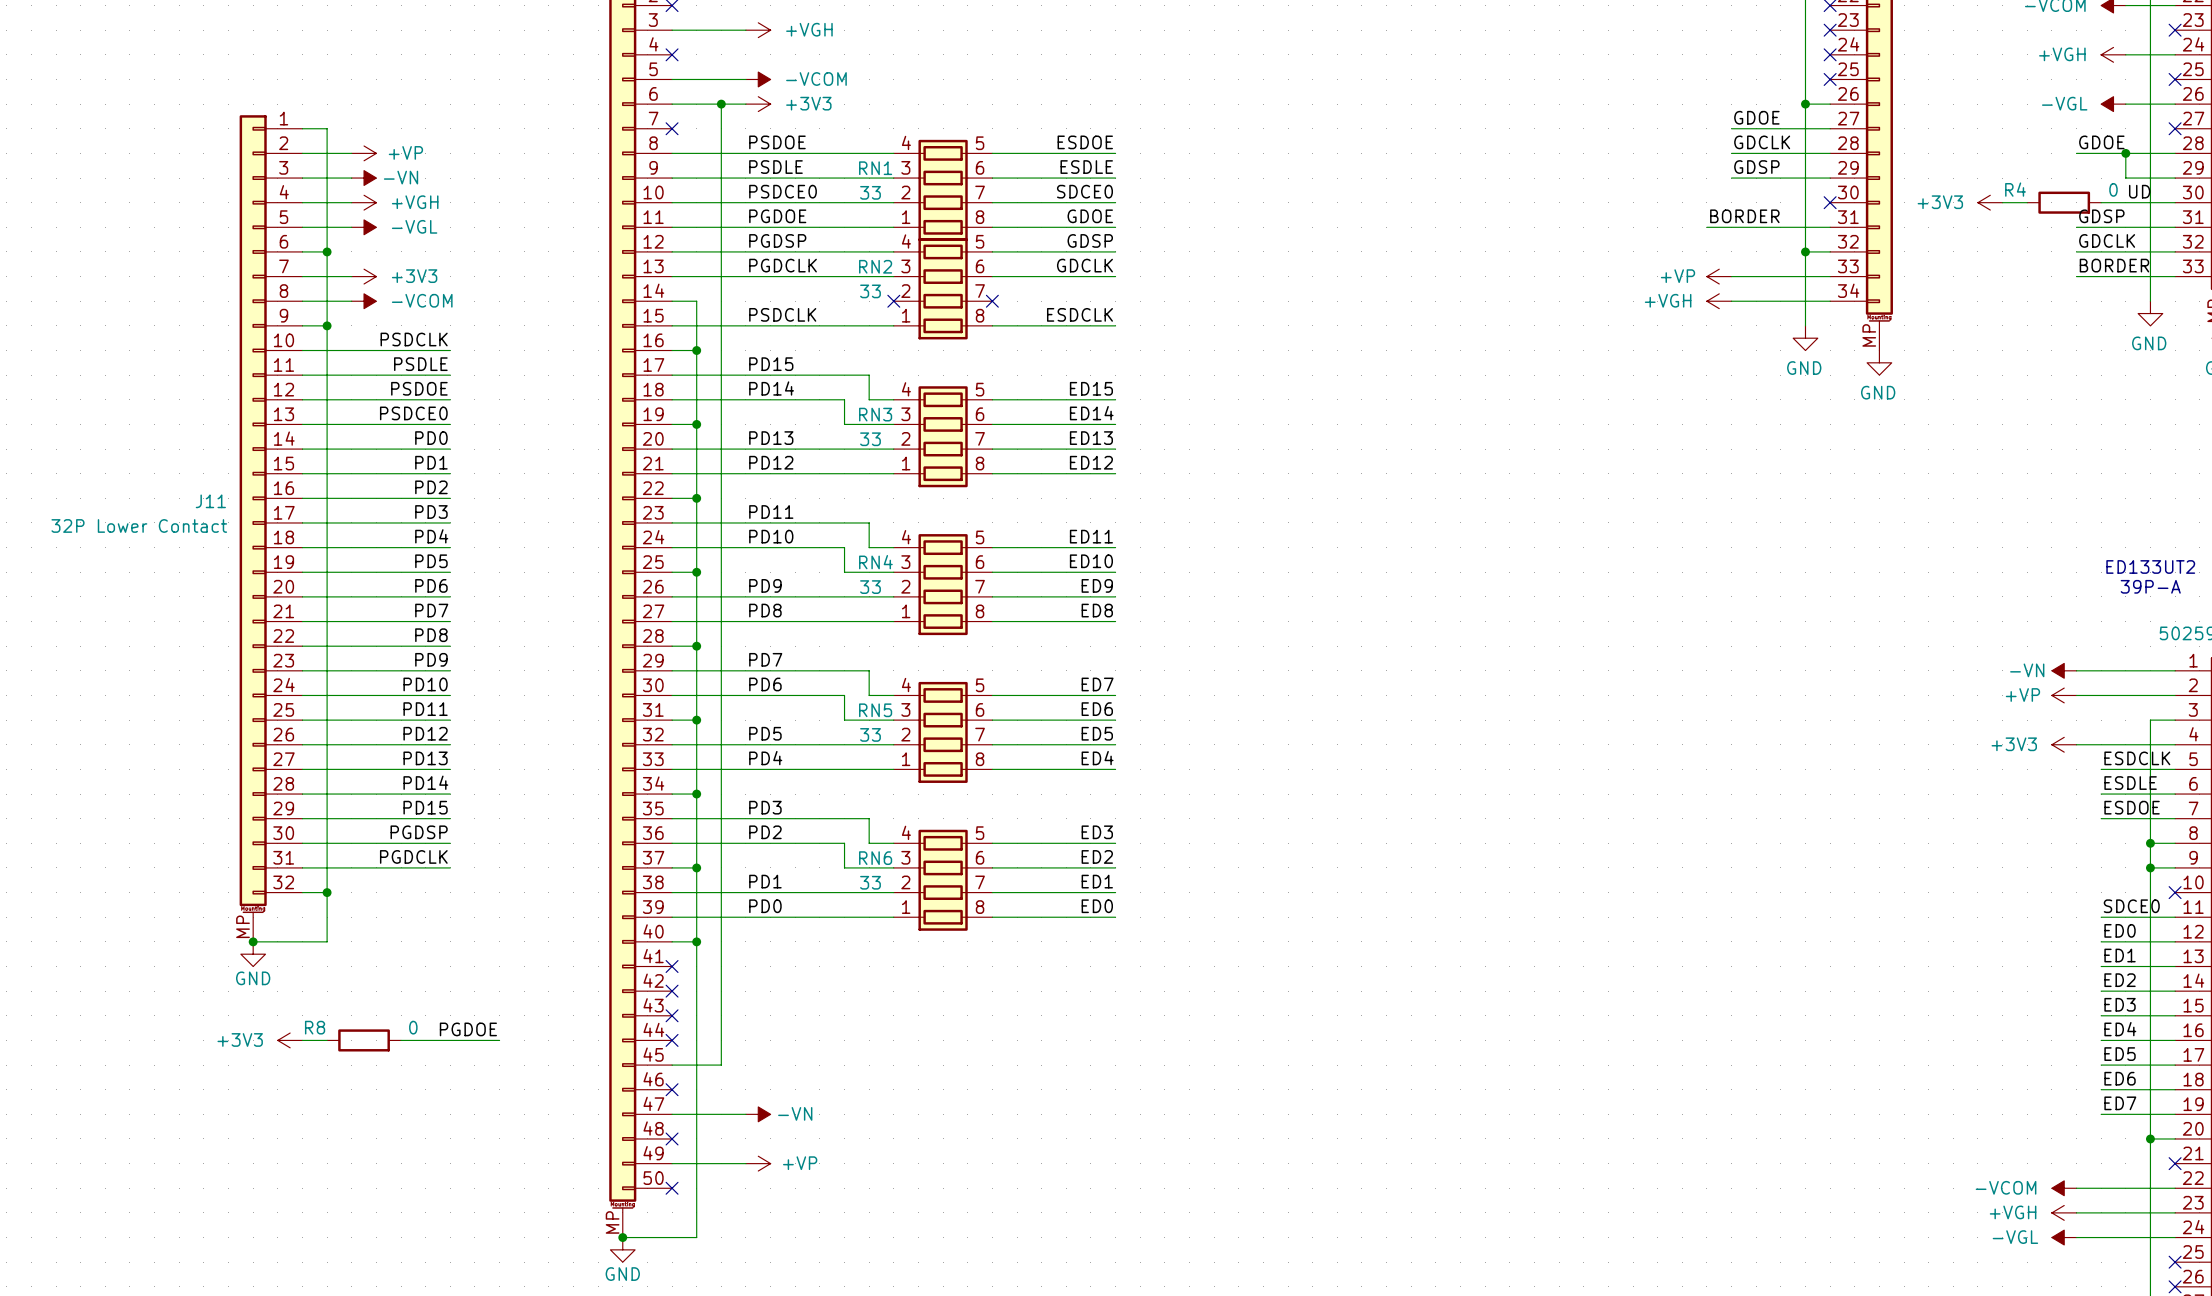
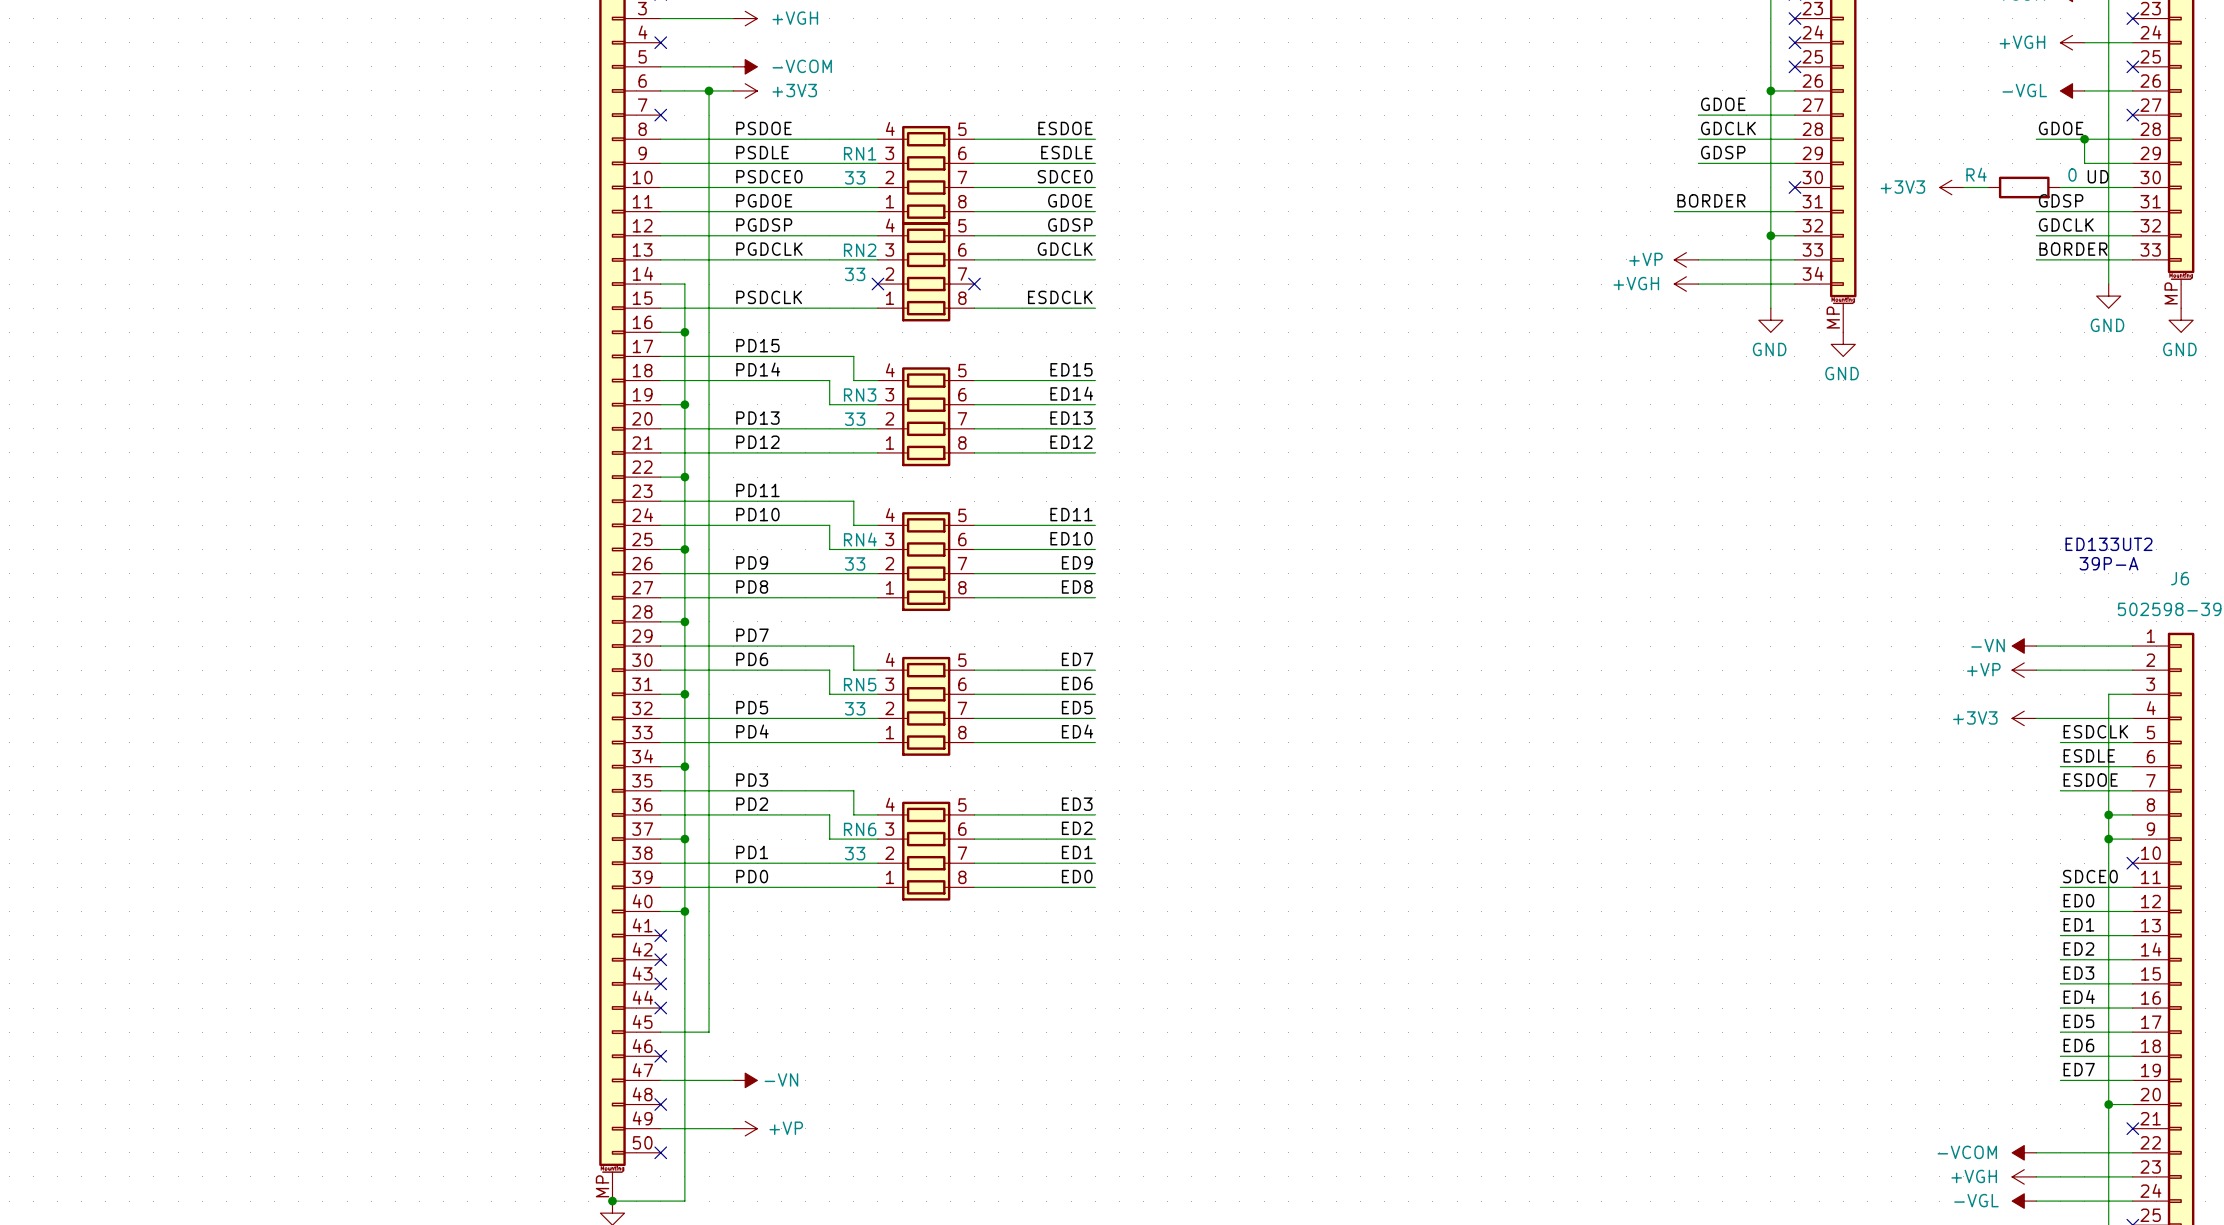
wire: (302, 128) (327, 128) (327, 941) (253, 941) -> none
wire: (302, 153) (351, 153) -> none
power symbol: +VP (364, 153) -> none
wire: (302, 178) (351, 178) -> none
power symbol: -VN (364, 178) -> none
wire: (302, 202) (351, 202) -> none
power symbol: +VGH (364, 202) -> none
wire: (302, 227) (351, 227) -> none
power symbol: -VGL (364, 227) -> none
wire: (302, 251) (327, 251) -> none
junction: (327, 251) -> none
wire: (302, 276) (351, 276) -> none
power symbol: +3V3 (364, 276) -> none
wire: (302, 301) (351, 301) -> none
power symbol: -VCOM (364, 301) -> none
wire: (302, 325) (327, 325) -> none
junction: (327, 325) -> none
label: PSDCLK (414, 339) -> none
wire: (302, 350) (450, 350) -> none
label: PSDLE (420, 364) -> none
wire: (302, 375) (450, 375) -> none
label: PSDOE (419, 388) -> none
wire: (302, 399) (450, 399) -> none
label: PSDCE0 (413, 413) -> none
wire: (302, 424) (450, 424) -> none
label: PD0 (431, 438) -> none
wire: (302, 449) (450, 449) -> none
label: PD1 (431, 462) -> none
wire: (302, 473) (450, 473) -> none
label: PD2 (431, 487) -> none
wire: (302, 498) (450, 498) -> none
label: PD3 (431, 511) -> none
wire: (302, 522) (450, 522) -> none
J11: 32P Lower Contact (271, 528) -> none
label: PD4 (431, 536) -> none
wire: (302, 547) (450, 547) -> none
label: PD5 (431, 561) -> none
wire: (302, 572) (450, 572) -> none
label: PD6 (431, 585) -> none
wire: (302, 596) (450, 596) -> none
label: PD7 (431, 610) -> none
wire: (302, 621) (450, 621) -> none
label: PD8 (431, 635) -> none
wire: (302, 646) (450, 646) -> none
label: PD9 (431, 659) -> none
wire: (302, 670) (450, 670) -> none
label: PD10 (425, 684) -> none
wire: (302, 695) (450, 695) -> none
label: PD11 (425, 709) -> none
wire: (302, 720) (450, 720) -> none
label: PD12 (425, 733) -> none
wire: (302, 744) (450, 744) -> none
label: PD13 (425, 758) -> none
wire: (302, 769) (450, 769) -> none
label: PD14 (425, 782) -> none
wire: (302, 794) (450, 794) -> none
label: PD15 (425, 807) -> none
wire: (302, 818) (450, 818) -> none
label: PGDSP (419, 832) -> none
wire: (302, 843) (450, 843) -> none
label: PGDCLK (413, 856) -> none
wire: (302, 867) (450, 867) -> none
wire: (302, 892) (327, 892) -> none
junction: (327, 892) -> none
junction: (253, 941) -> none
power symbol: GND (253, 954) -> none
label: PGDOE (468, 1029) -> none
power symbol: +3V3 (290, 1040) -> none
wire: (302, 1040) (327, 1040) -> none
R8: 0 (364, 1040) -> none
wire: (401, 1040) (499, 1040) -> none

